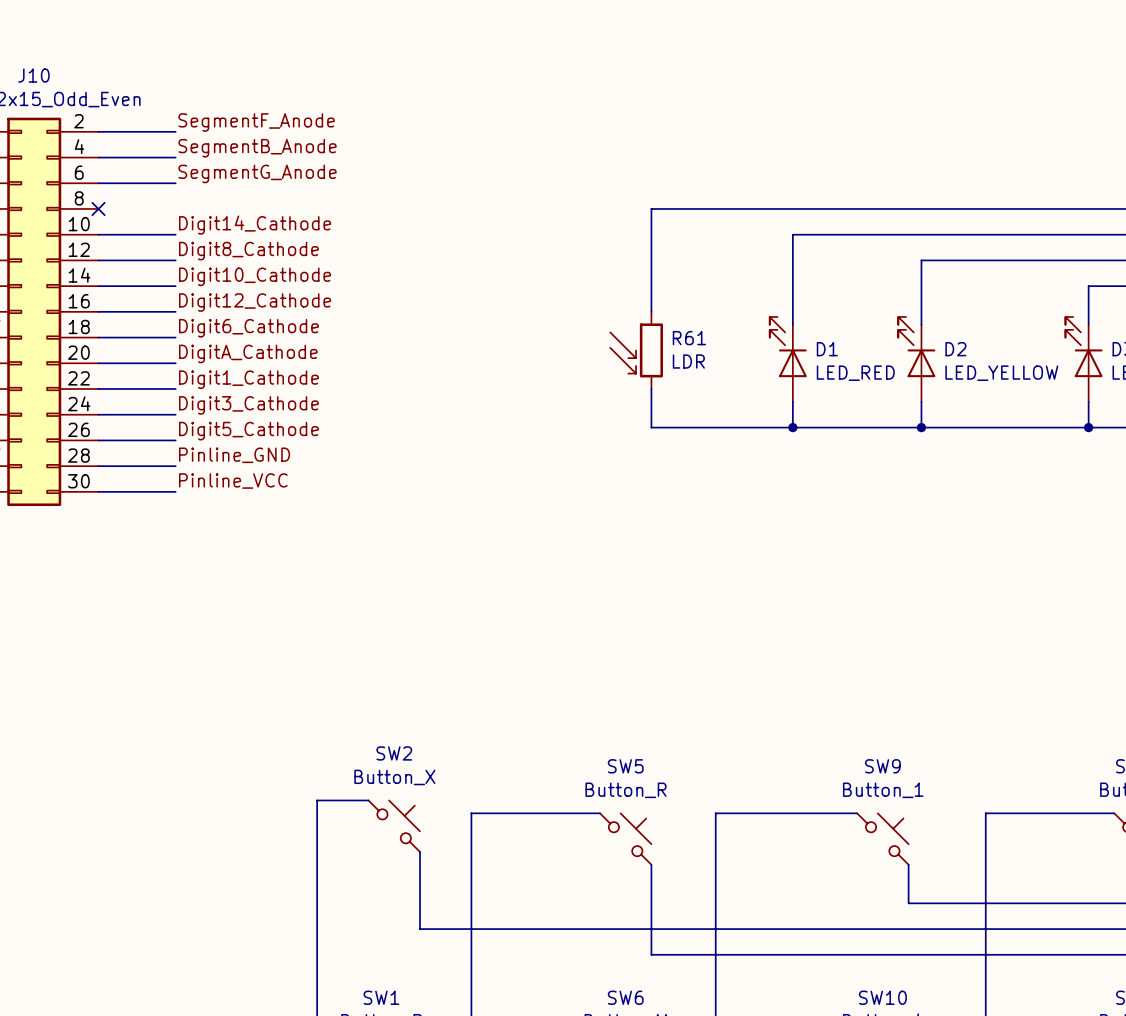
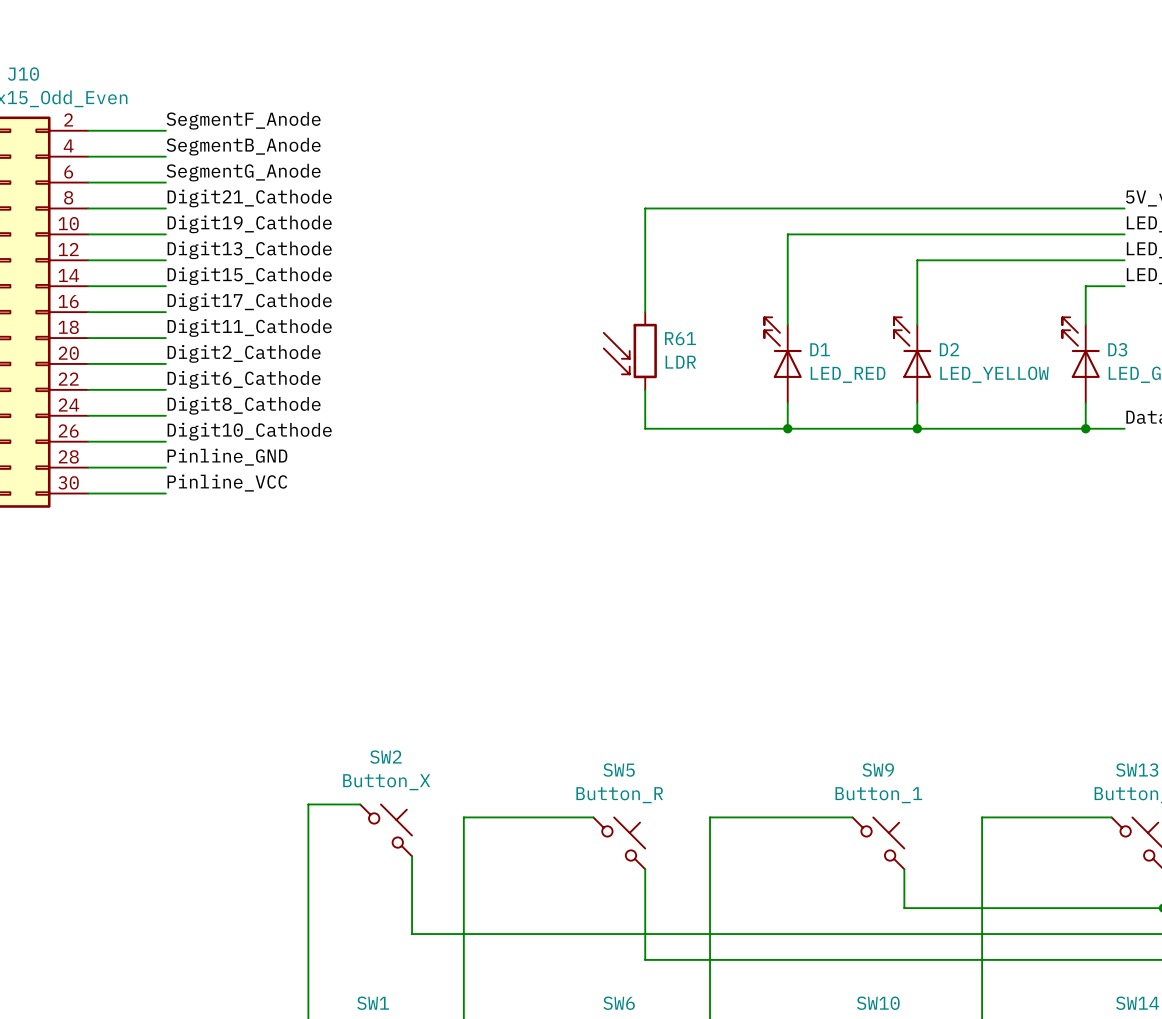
label: none -> Digit21_Cathode (249, 198)
wire: none -> (88, 208) (165, 208)
no-connect mark: (98, 208) -> none
label: Digit14_Cathode (255, 225) -> Digit19_Cathode (249, 224)
label: Digit8_Cathode (248, 251) -> Digit13_Cathode (249, 250)
label: Digit10_Cathode (255, 276) -> Digit15_Cathode (249, 276)
label: Digit12_Cathode (255, 302) -> Digit17_Cathode (249, 302)
label: Digit6_Cathode (248, 328) -> Digit11_Cathode (249, 327)
label: DigitA_Cathode (248, 353) -> Digit2_Cathode (244, 353)
label: Digit1_Cathode (248, 379) -> Digit6_Cathode (244, 379)
label: Digit3_Cathode (248, 405) -> Digit8_Cathode (244, 405)
label: Digit5_Cathode (248, 431) -> Digit10_Cathode (249, 431)

